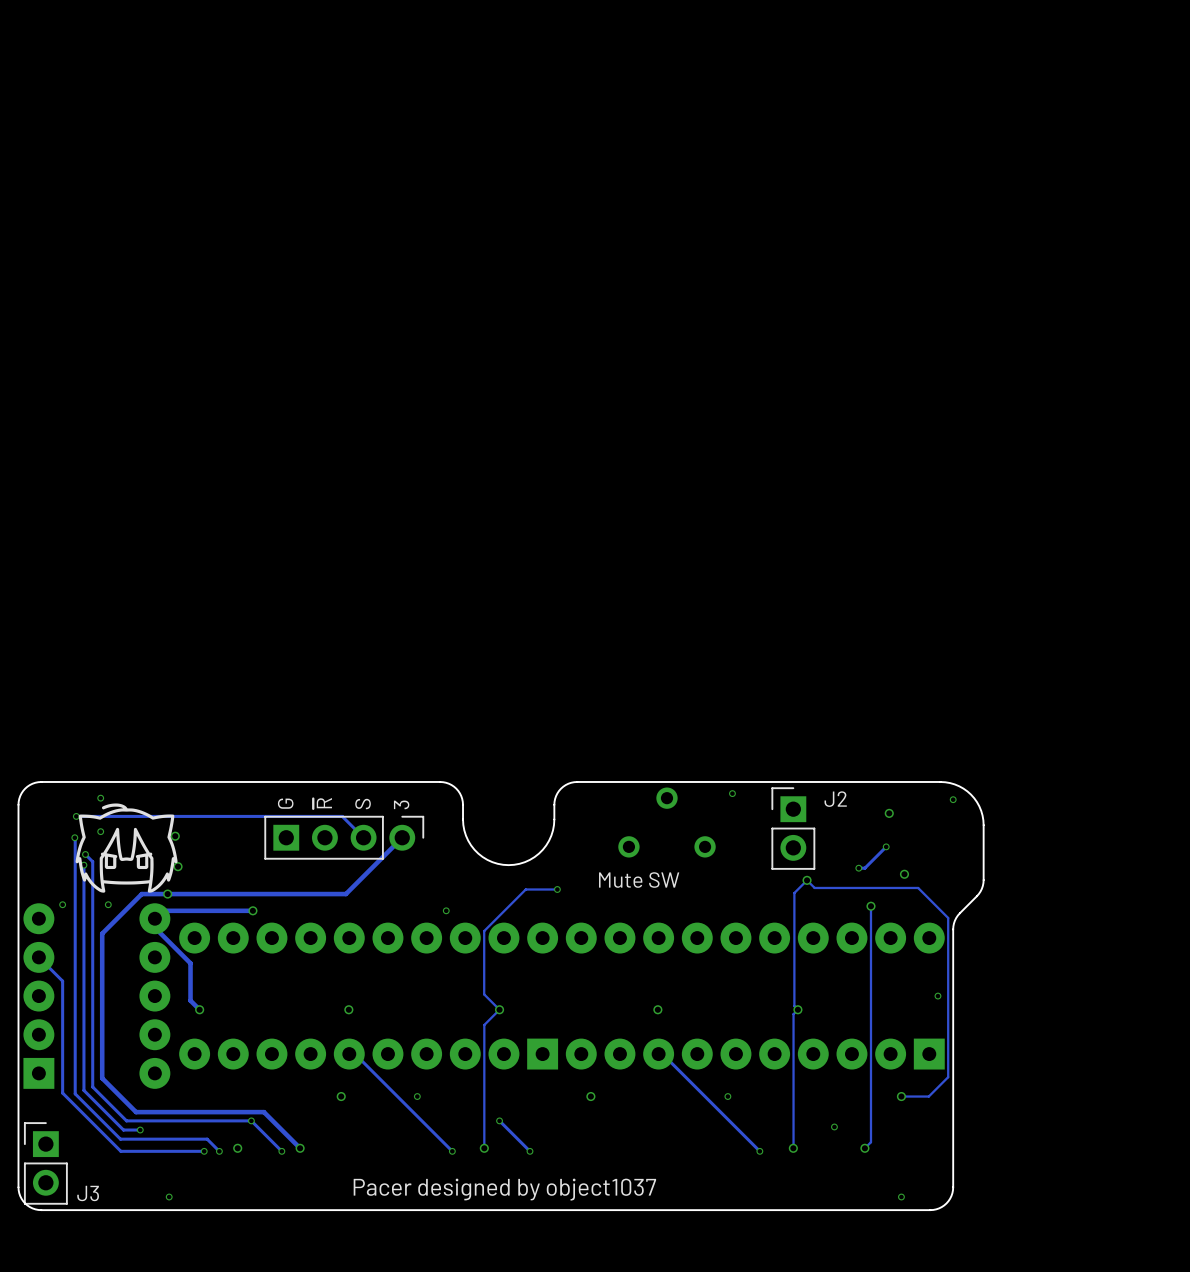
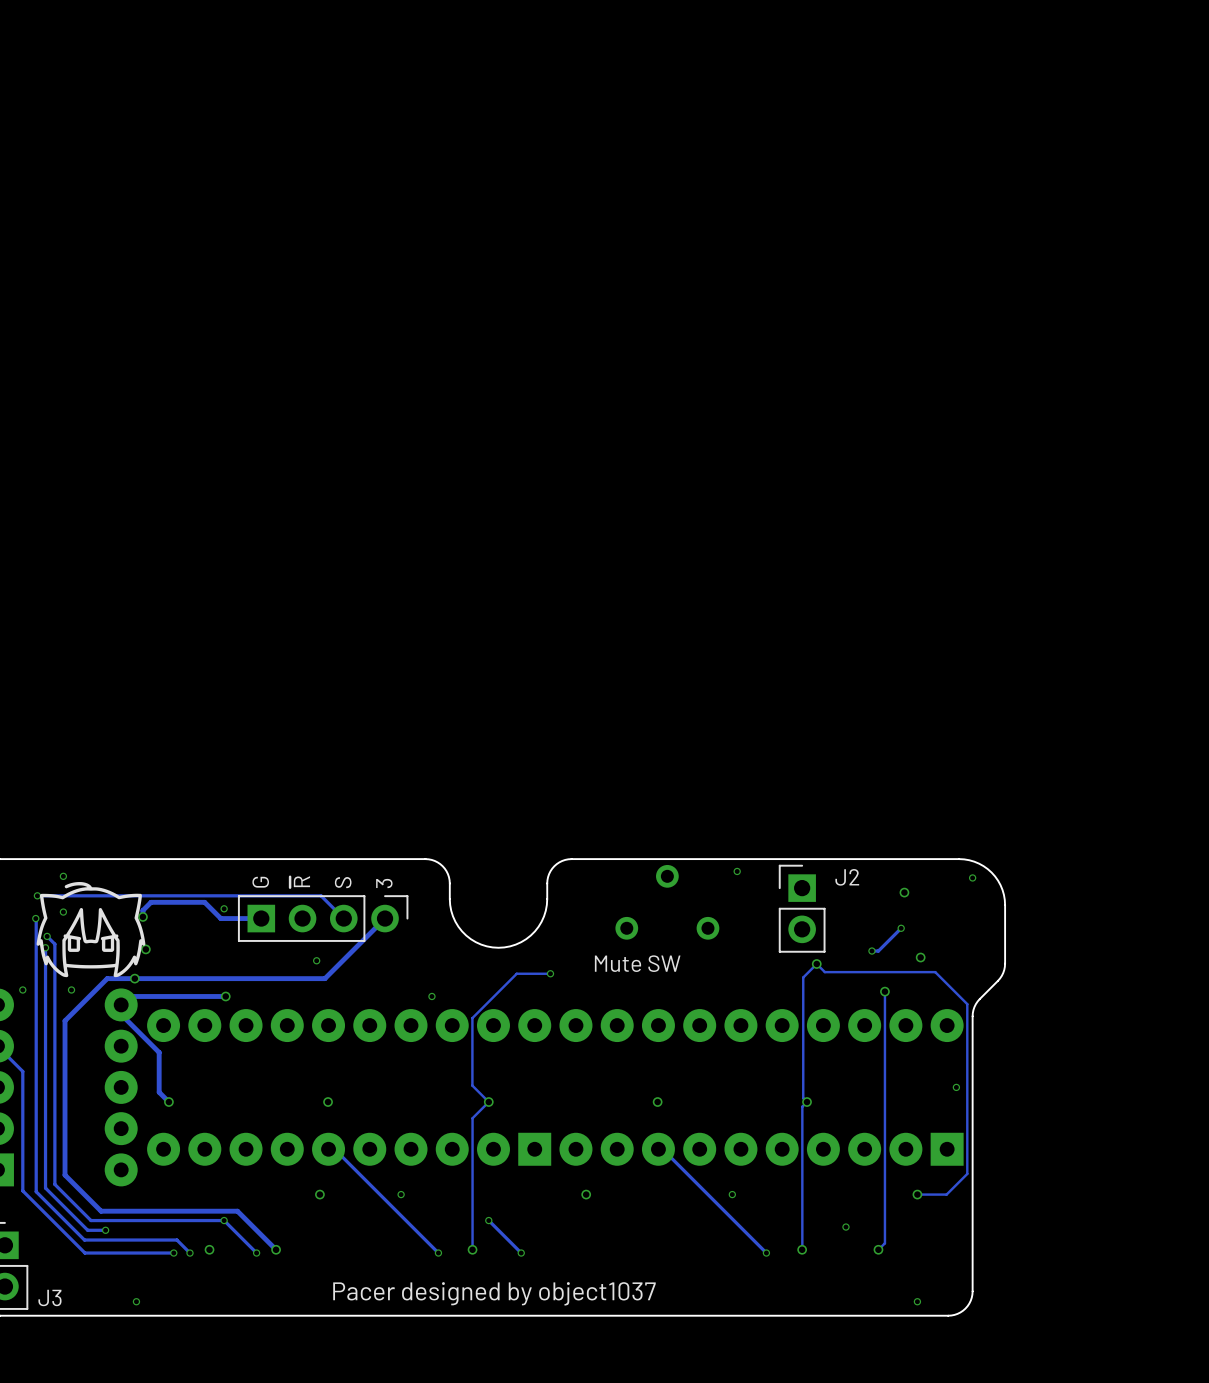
via: none -> (224, 908)
track: none -> (142, 916) (142, 910) (151, 902) (204, 902) (220, 918) (261, 918)
via: none -> (316, 960)

